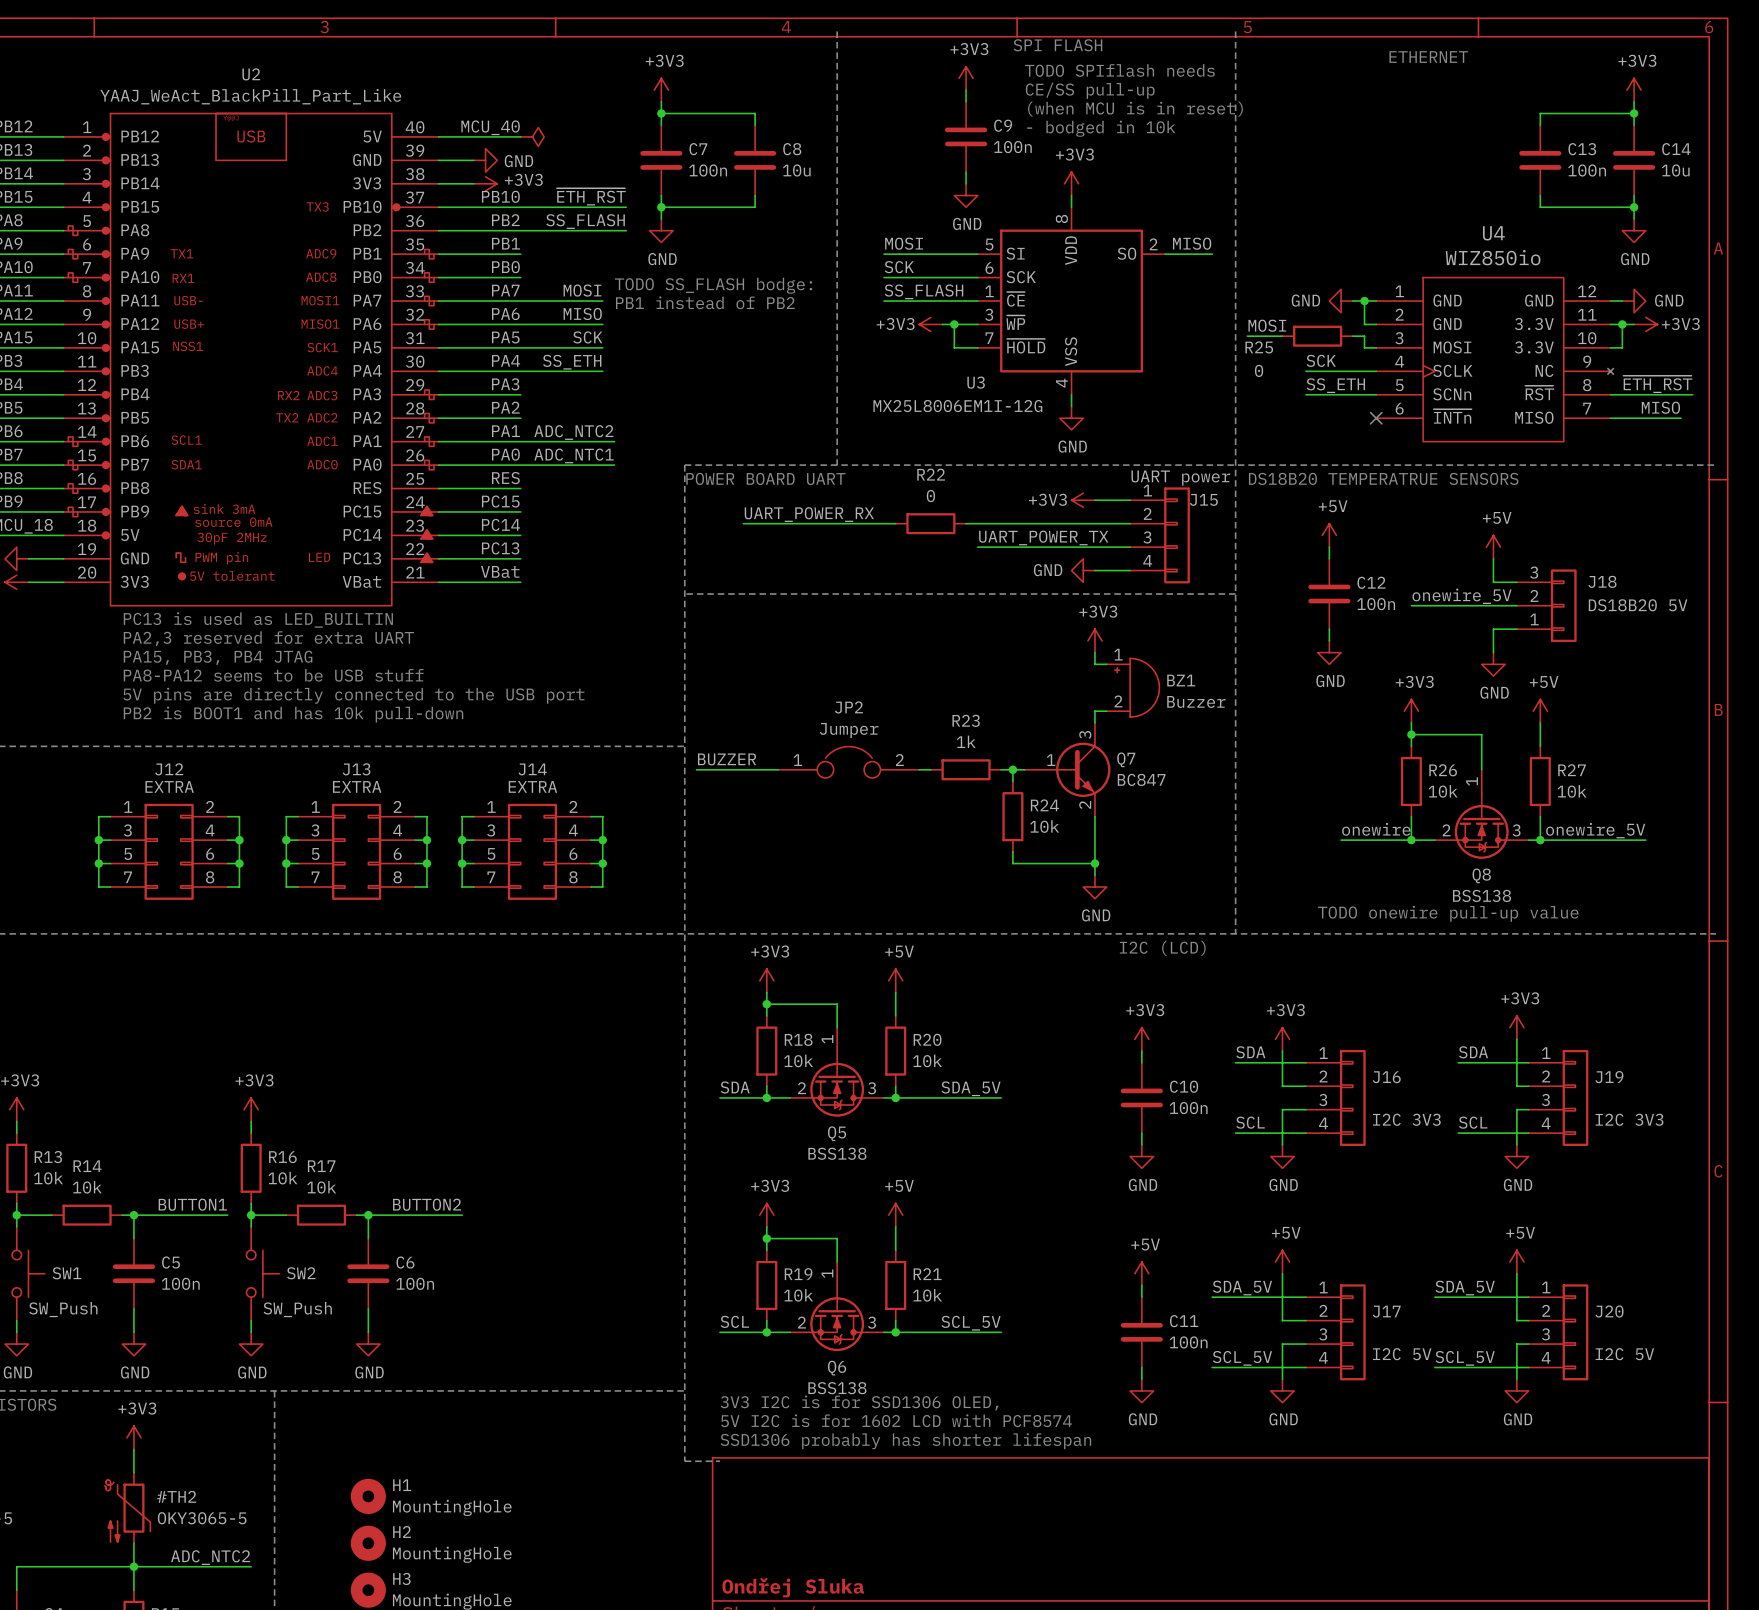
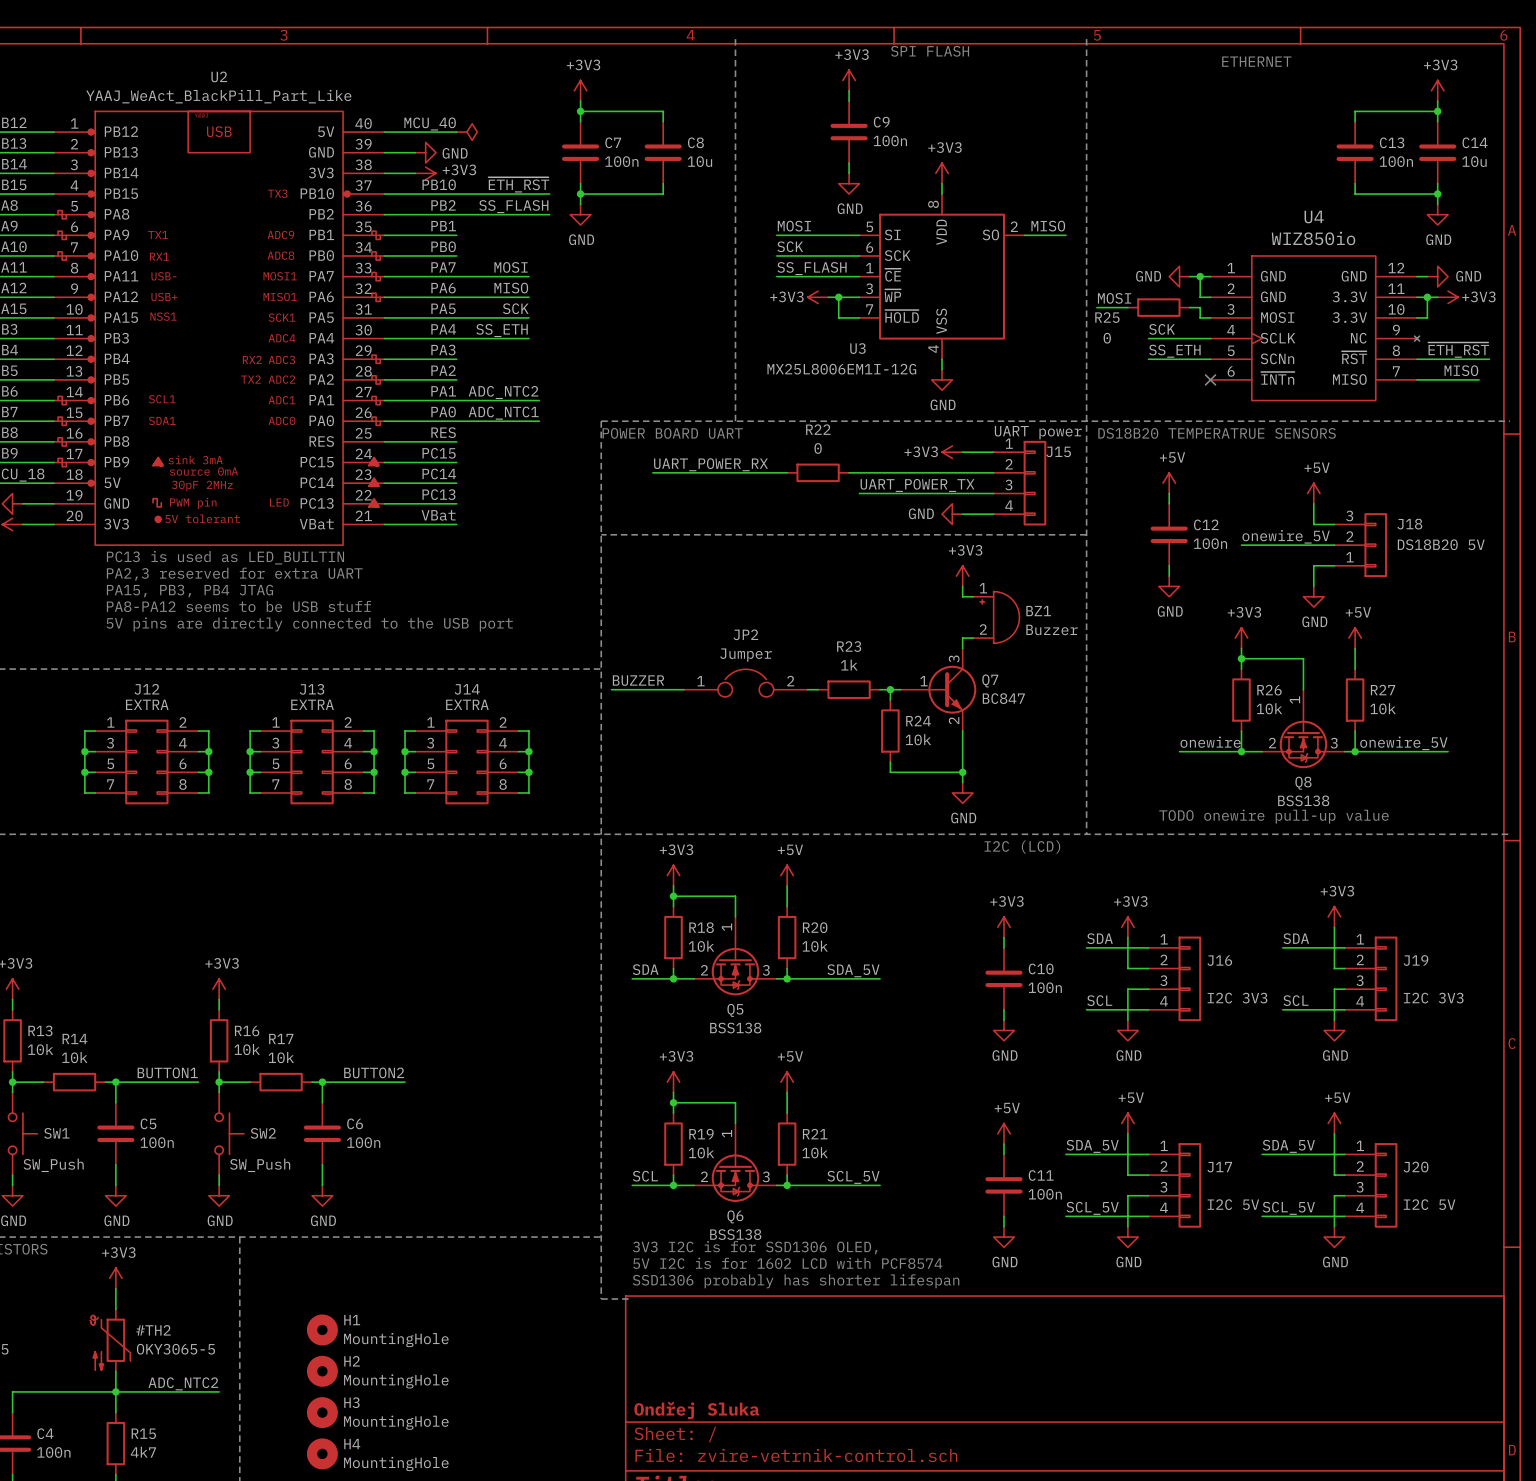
text: TODO SPIflash needs (1119, 70) -> none
text: CE/SS pull-up (1090, 90) -> none
text: (when MCU is in reset) (1135, 109) -> none
text: - bodged in 10k (1101, 128) -> none
text: TODO SS_FLASH bodge: (713, 285) -> none
text: PB1 instead of PB2 (705, 302) -> none
text: PB2 is BOOT1 and has 10k pull-down (293, 714) -> none

